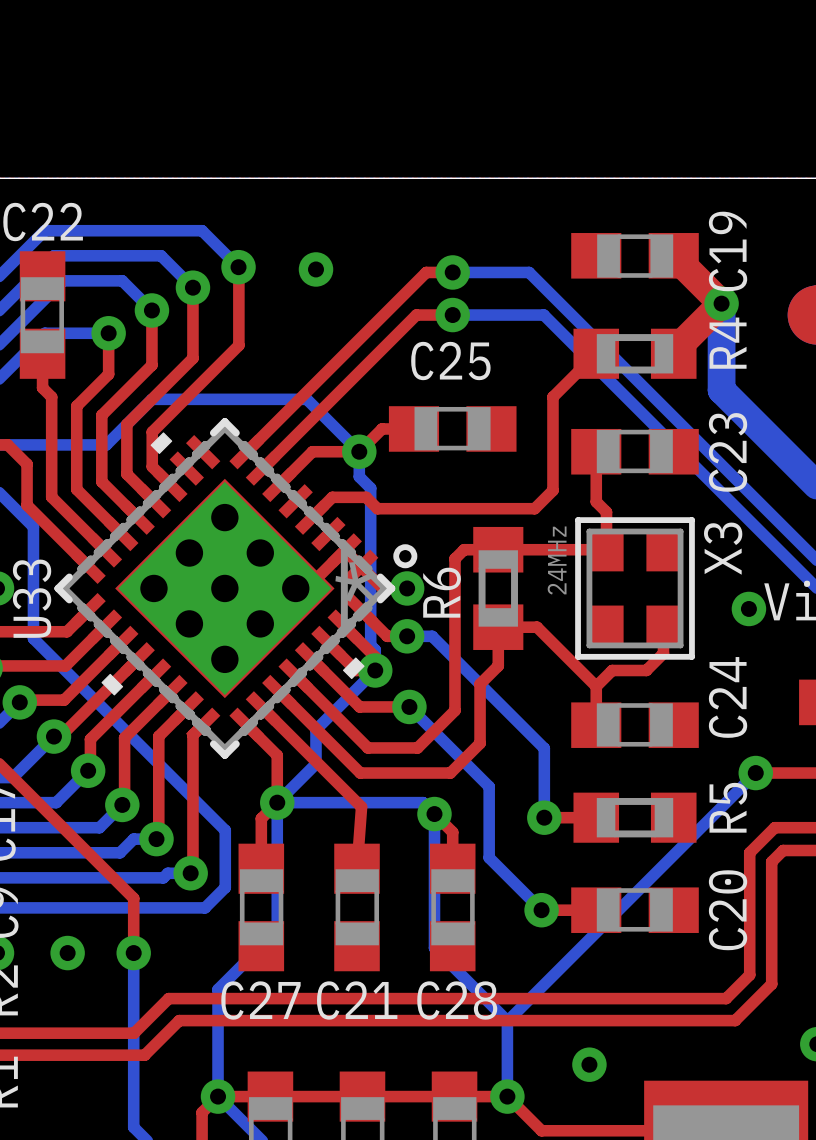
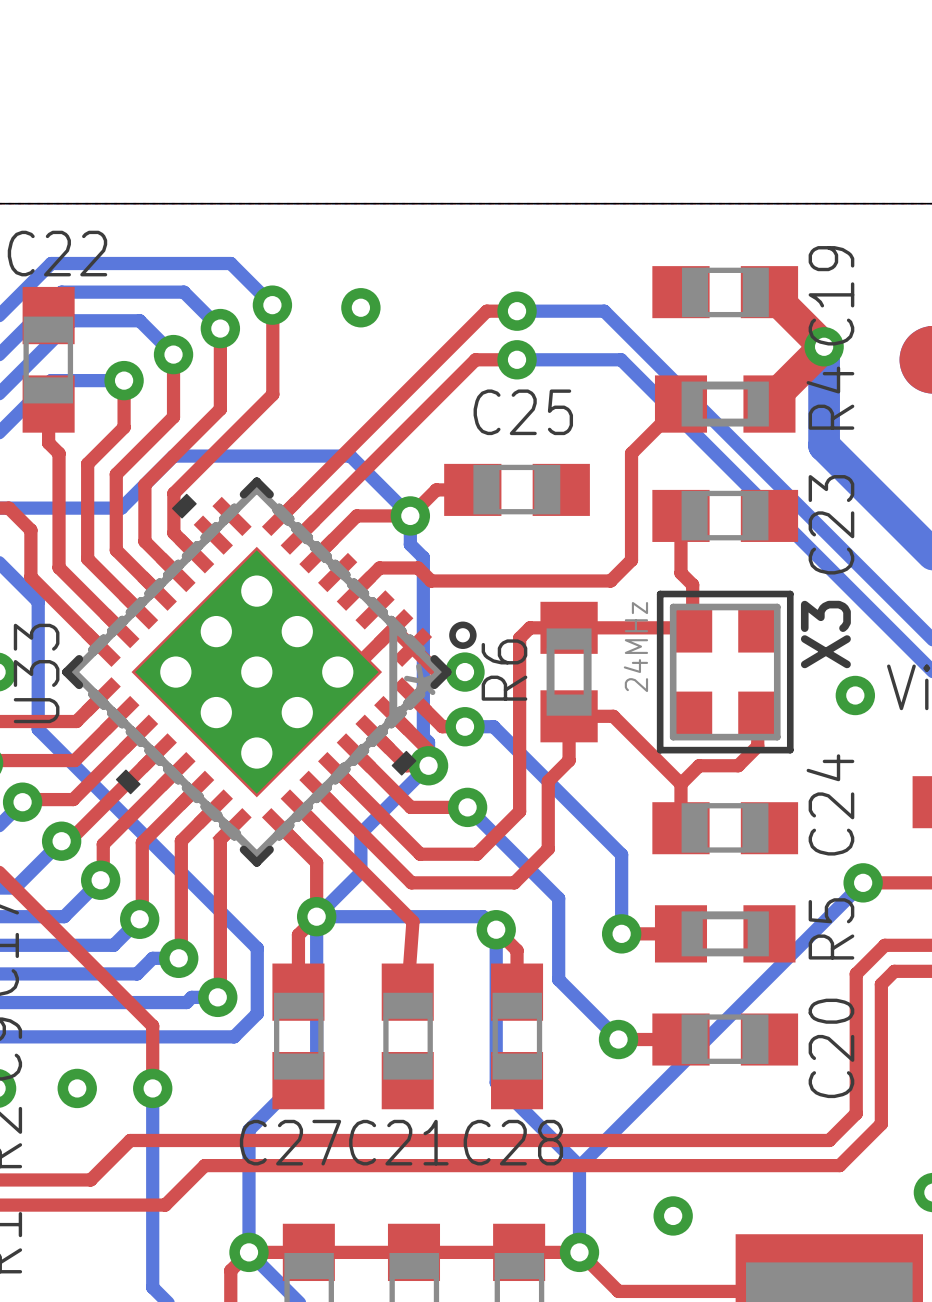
top track: (168, 998) (134, 1033) (79, 1033) -> (192, 1140) (130, 1140) (90, 1179)

